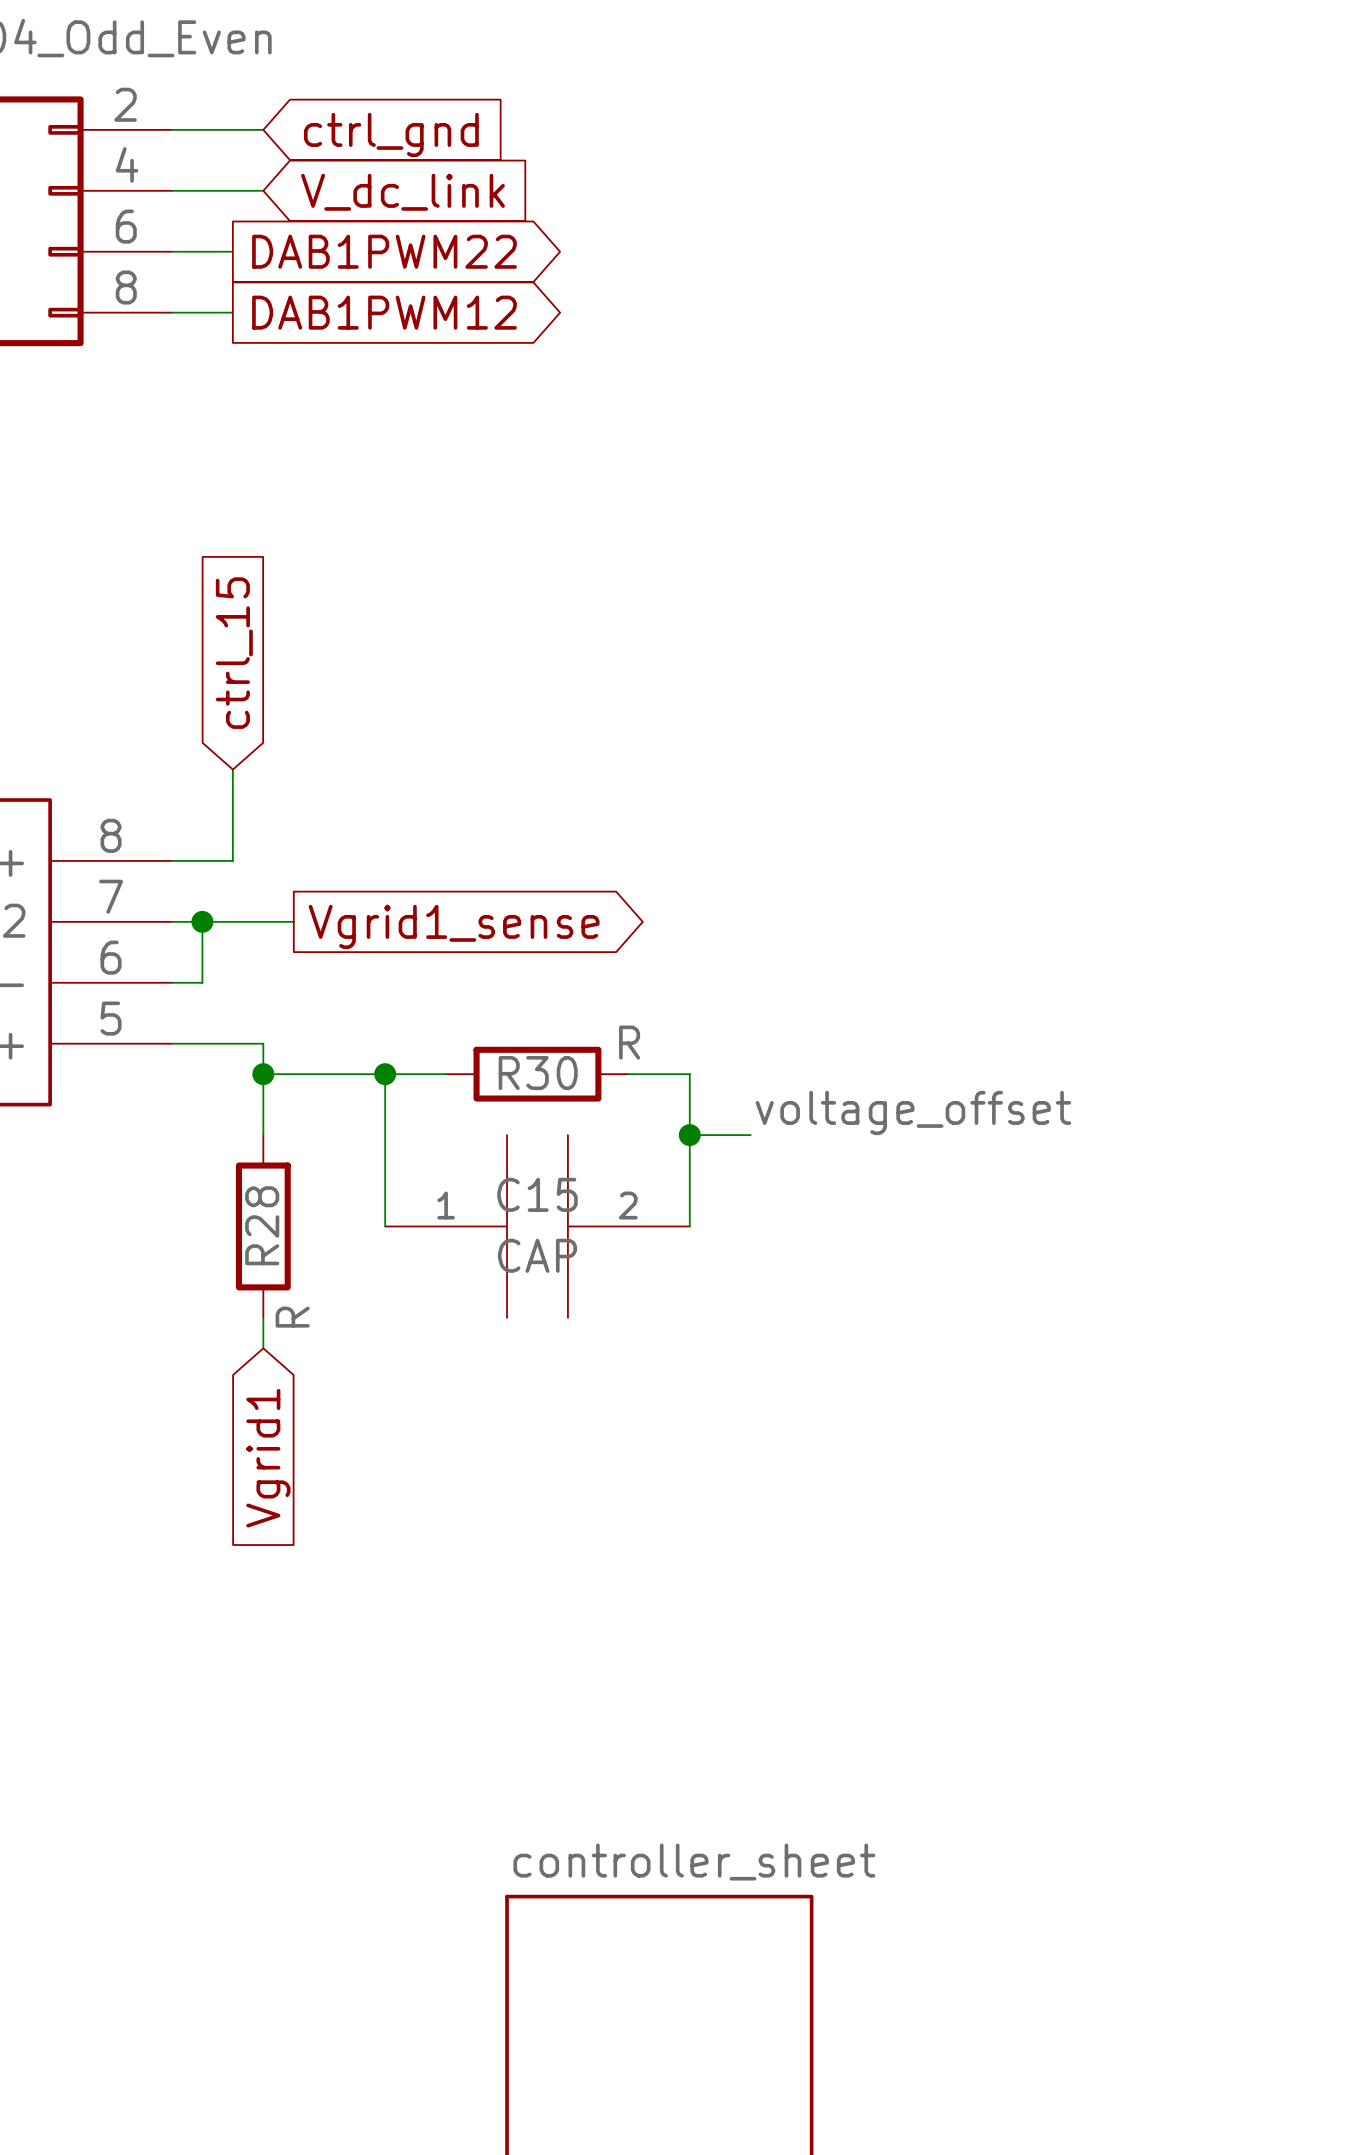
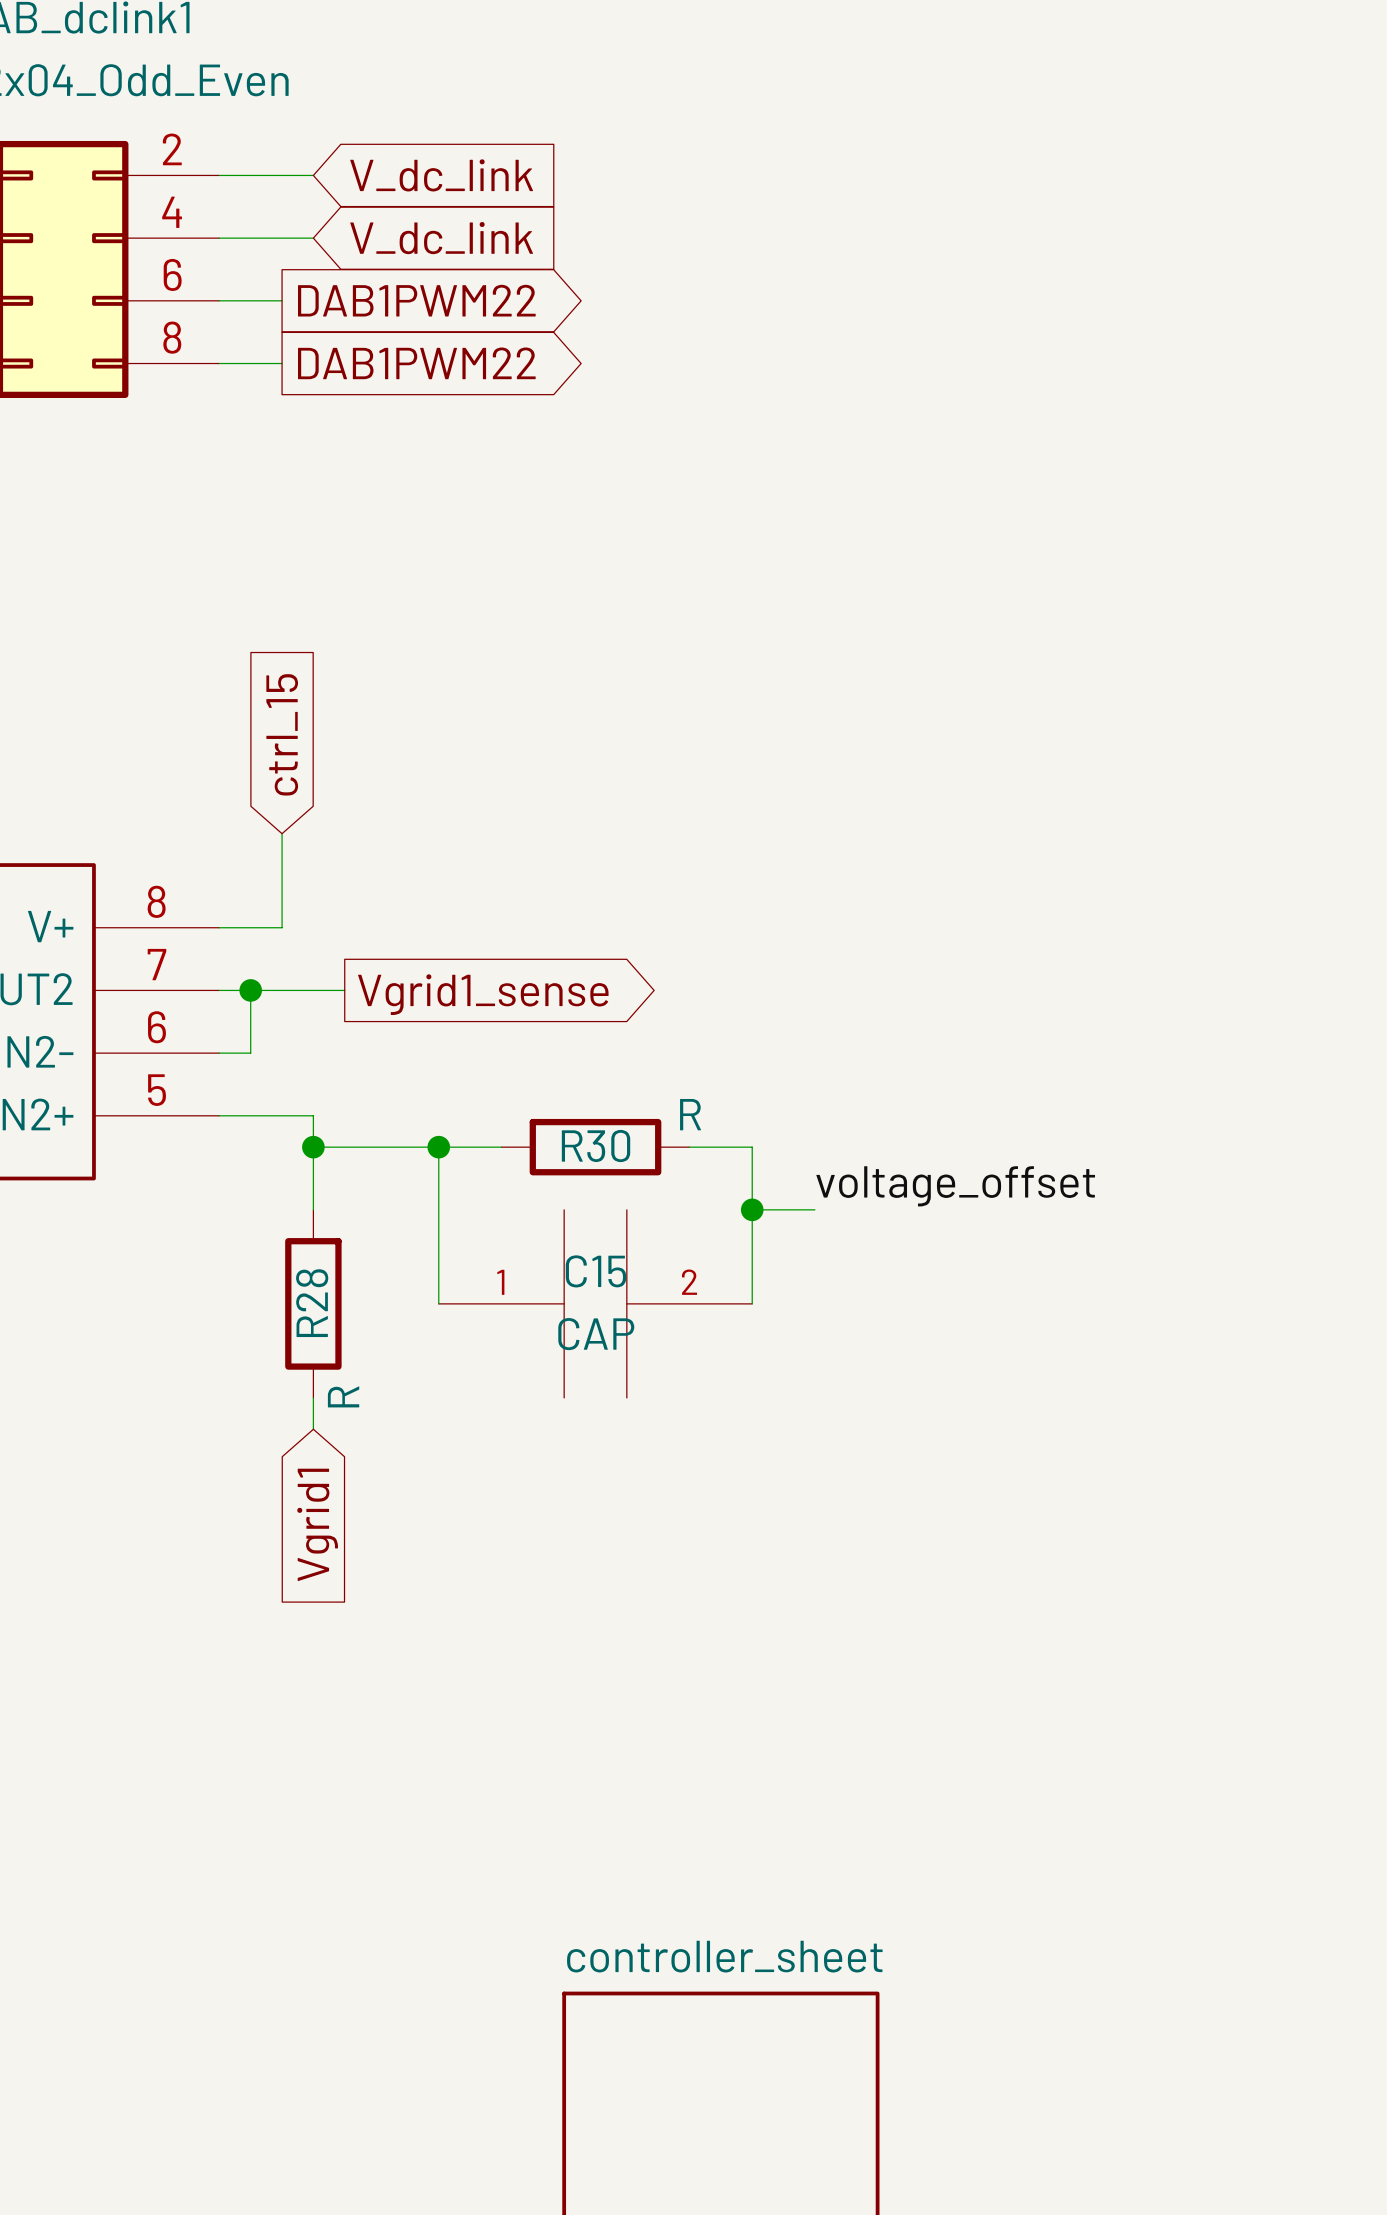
global label: ctrl_gnd (391, 134) -> V_dc_link (441, 175)
global label: DAB1PWM12 (384, 312) -> DAB1PWM22 (416, 363)

